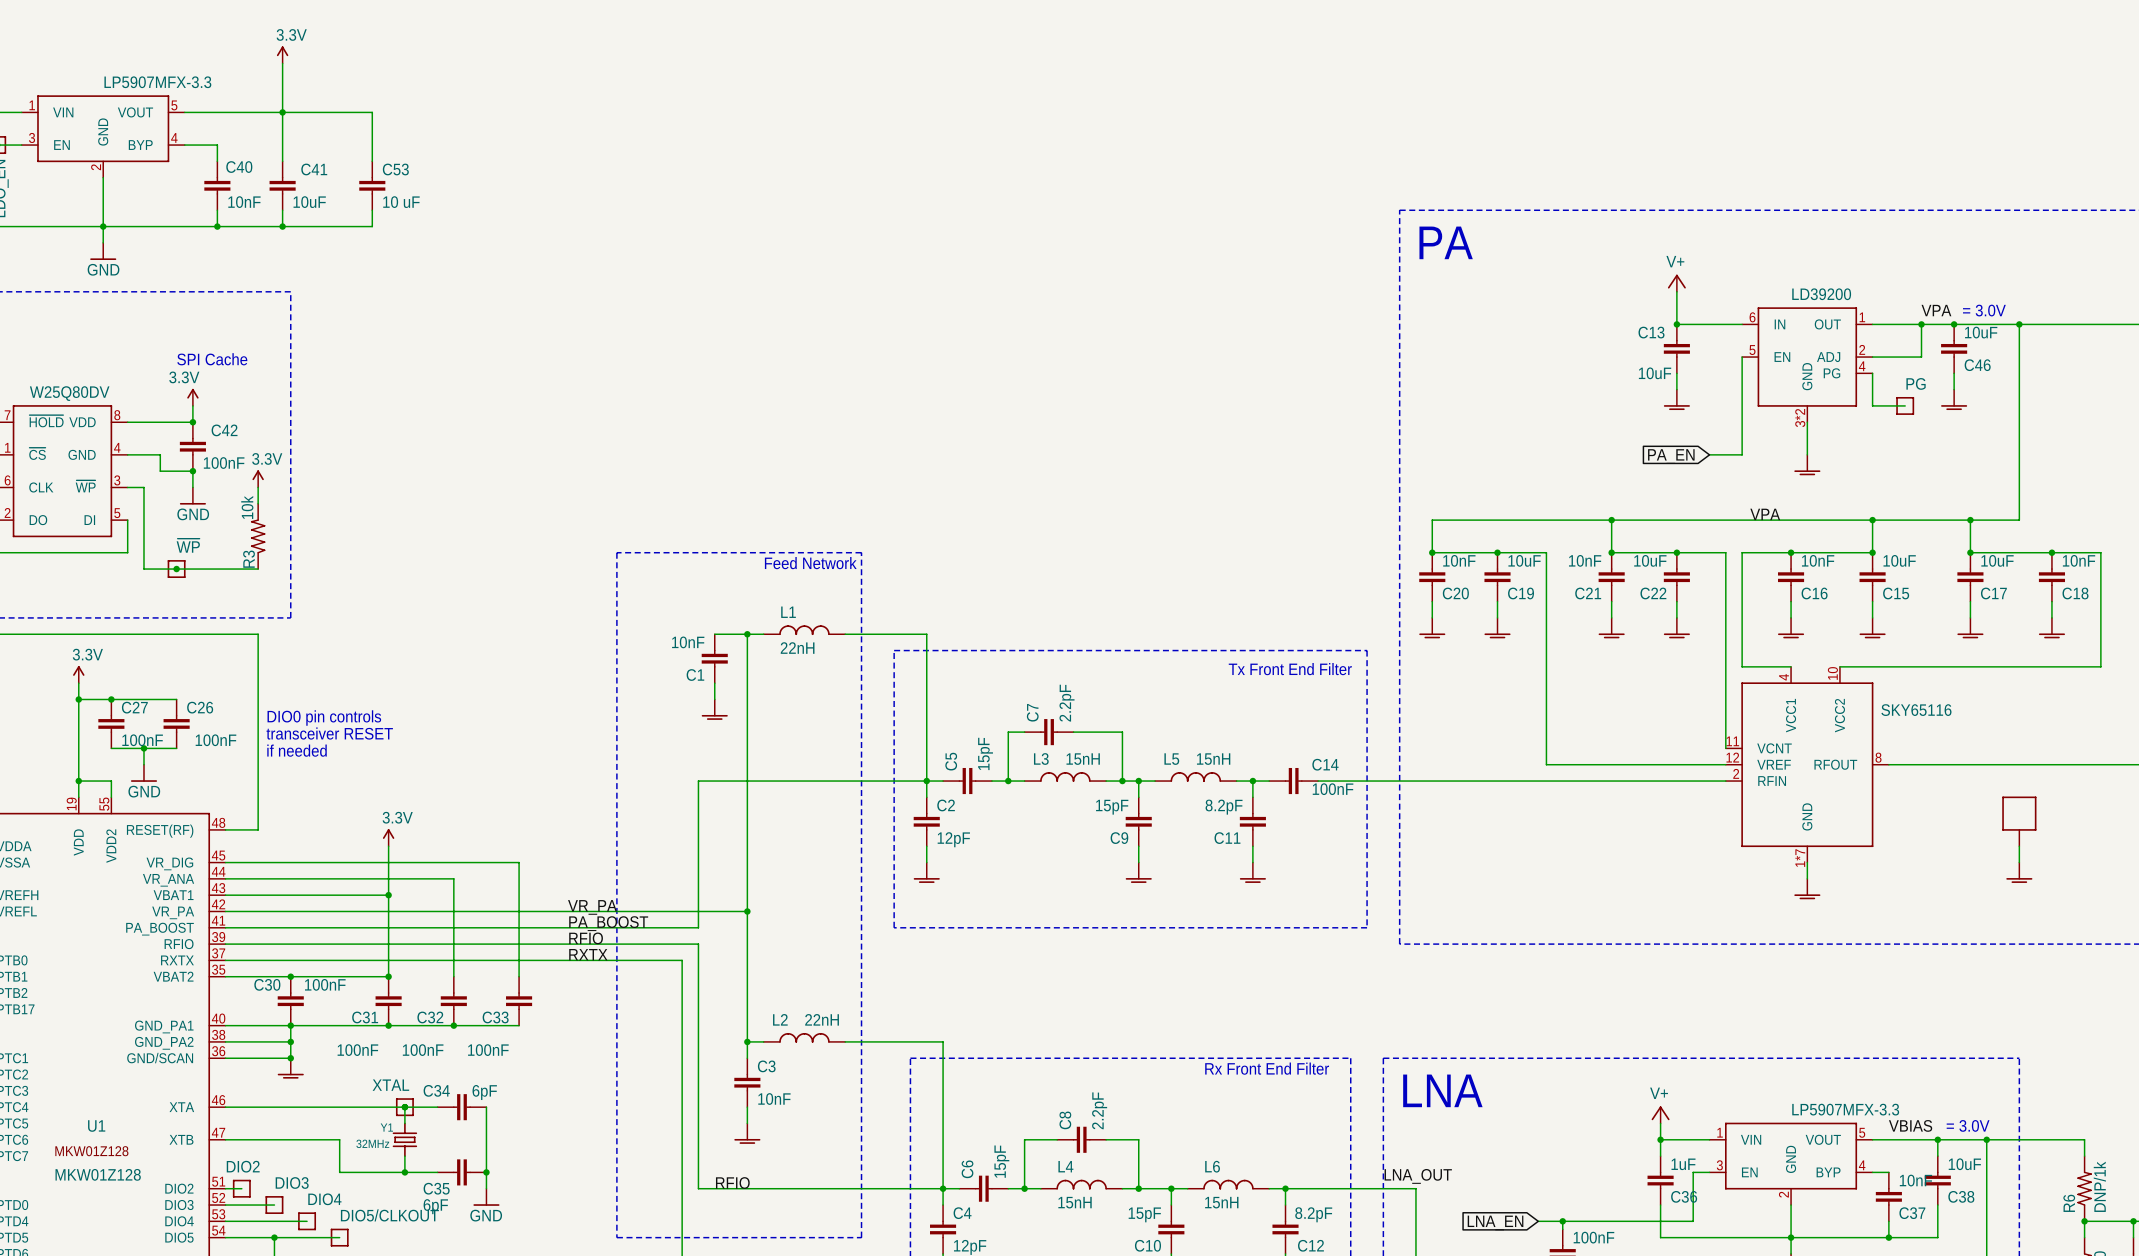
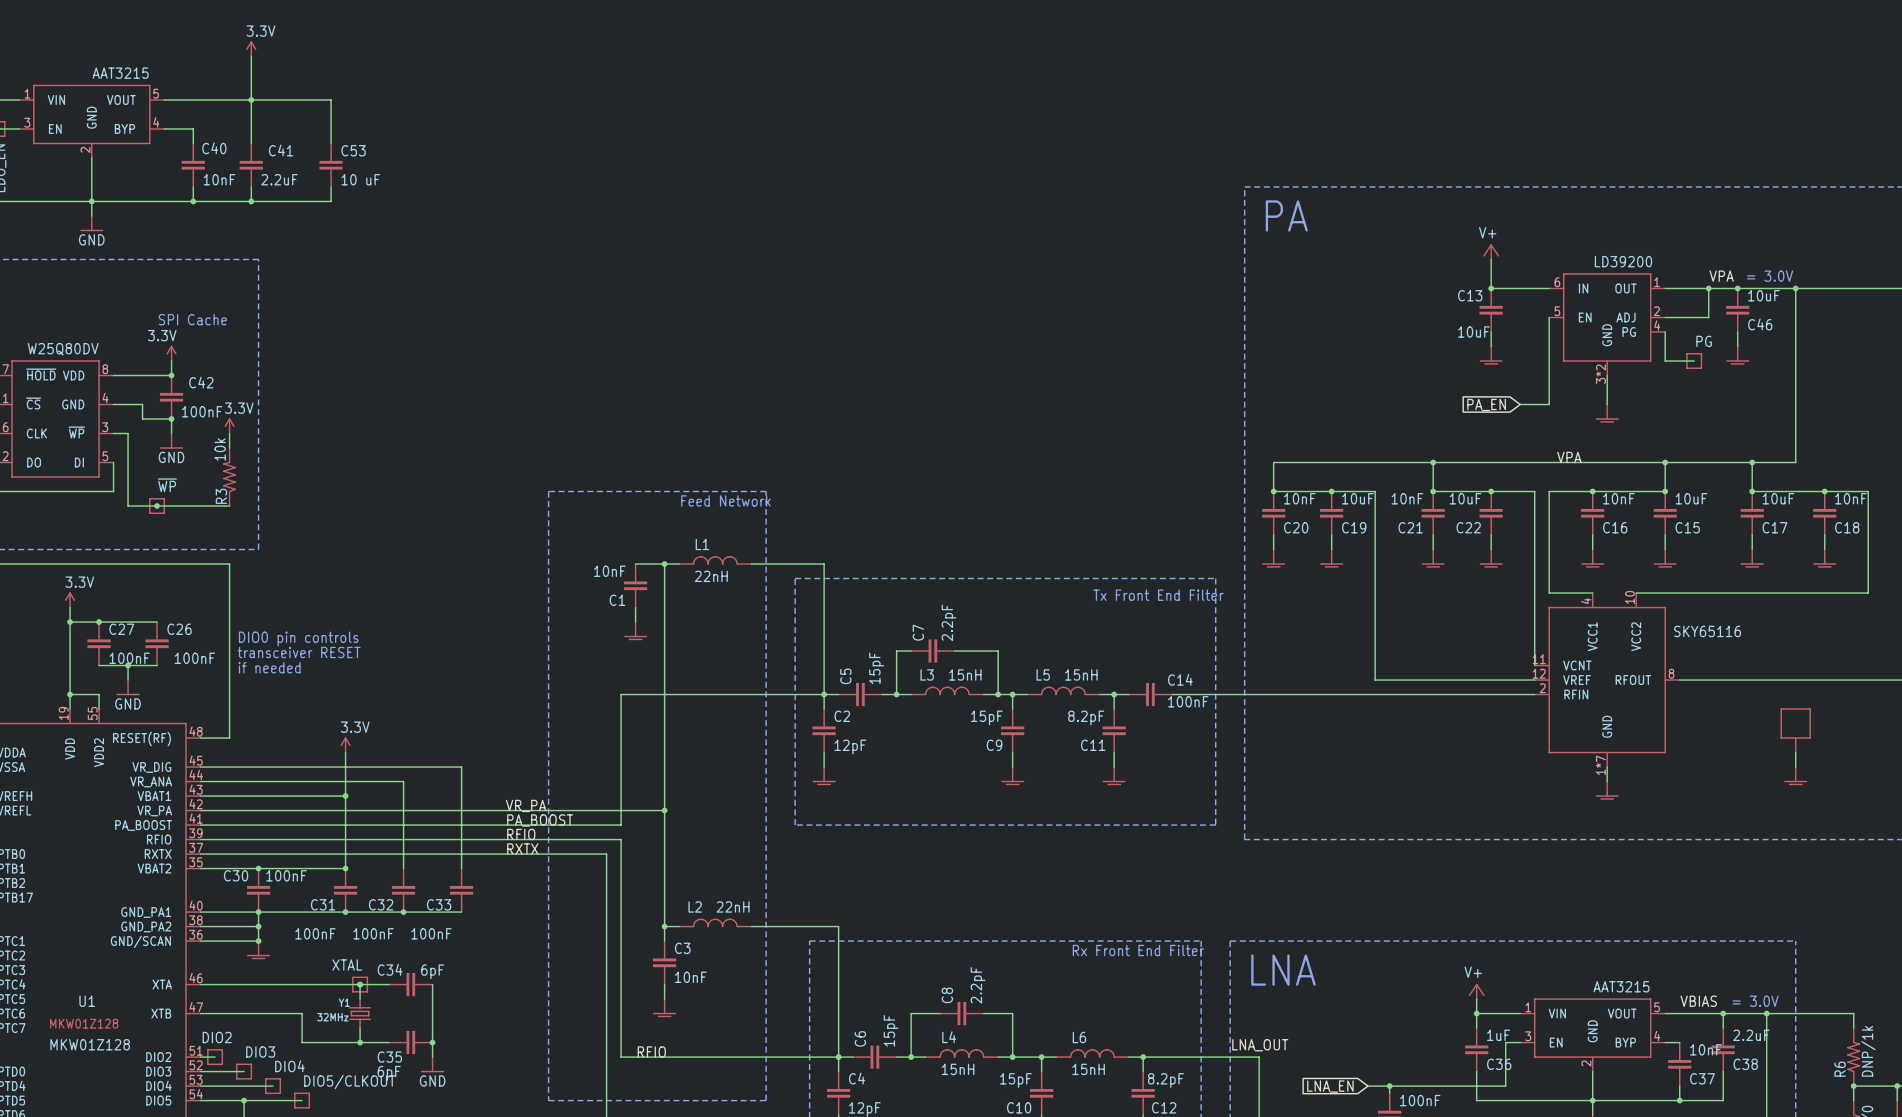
part value: LP5907MFX-3.3 (157, 82) -> AAT3215 (120, 73)
C41 value: 10uF (309, 202) -> 2.2uF (279, 179)
part value: LP5907MFX-3.3 (1845, 1109) -> AAT3215 (1621, 986)
C38 value: 10uF (1964, 1164) -> 2.2uF (1751, 1035)

